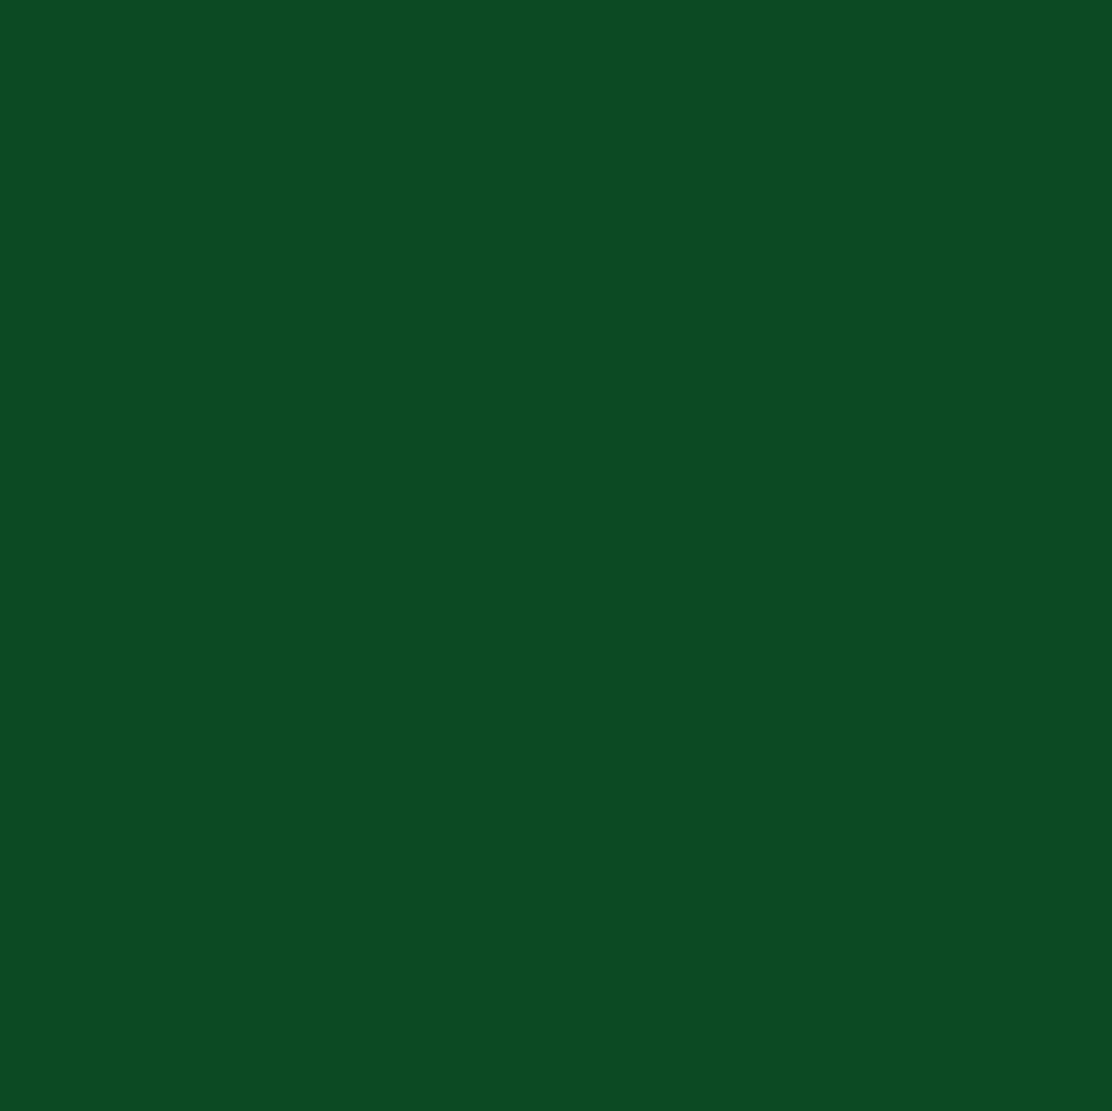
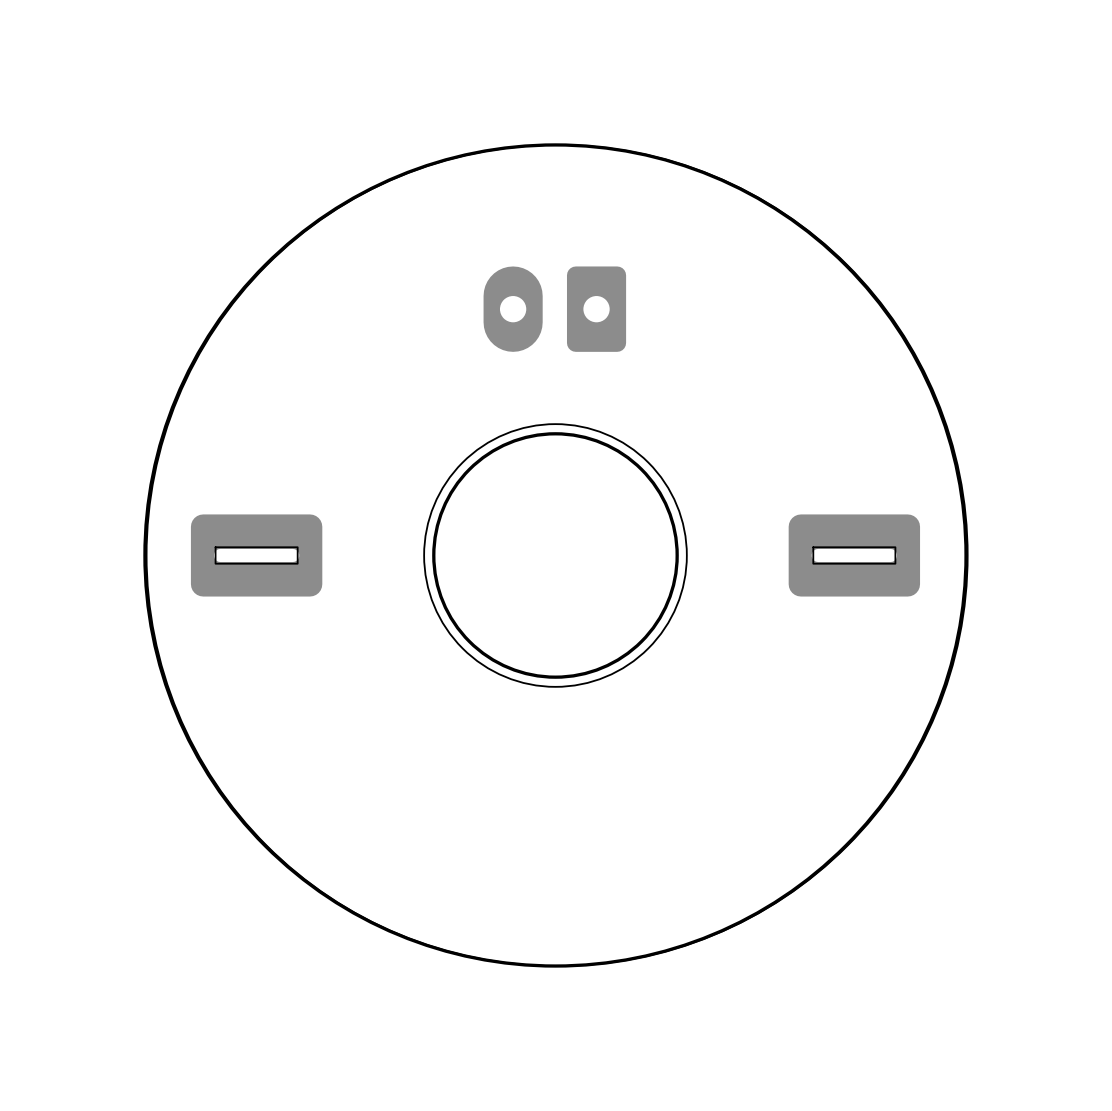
part: none -> (555, 555)

